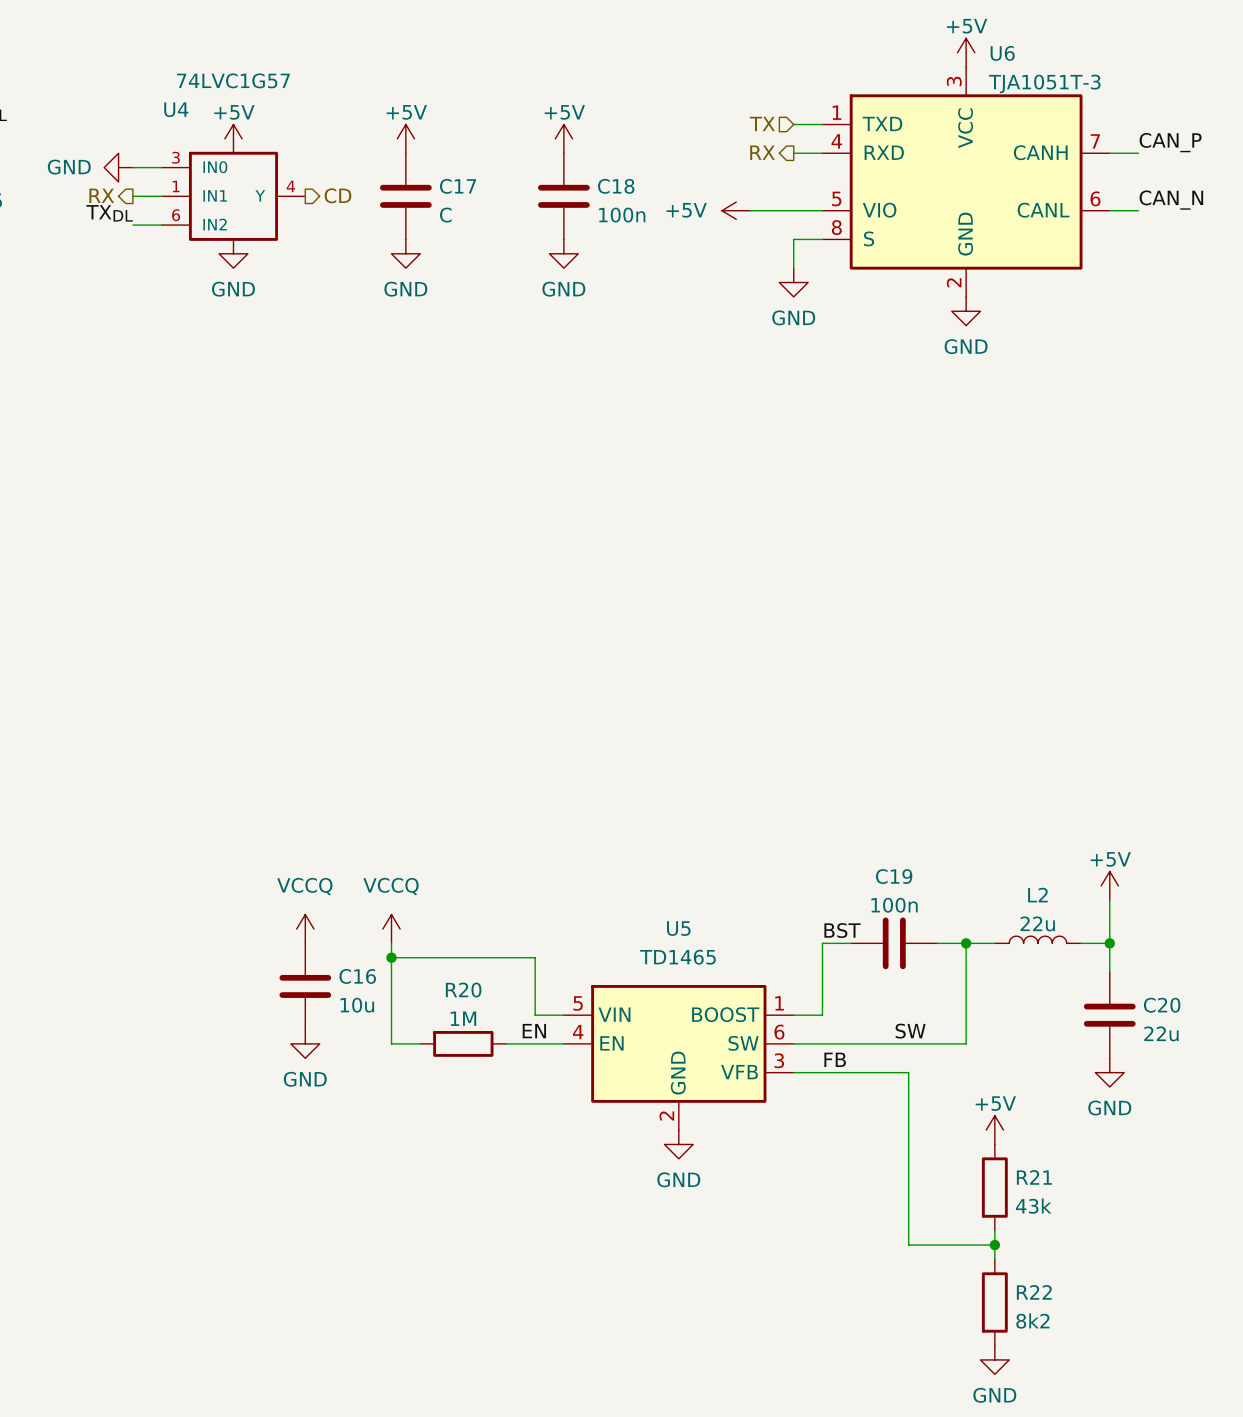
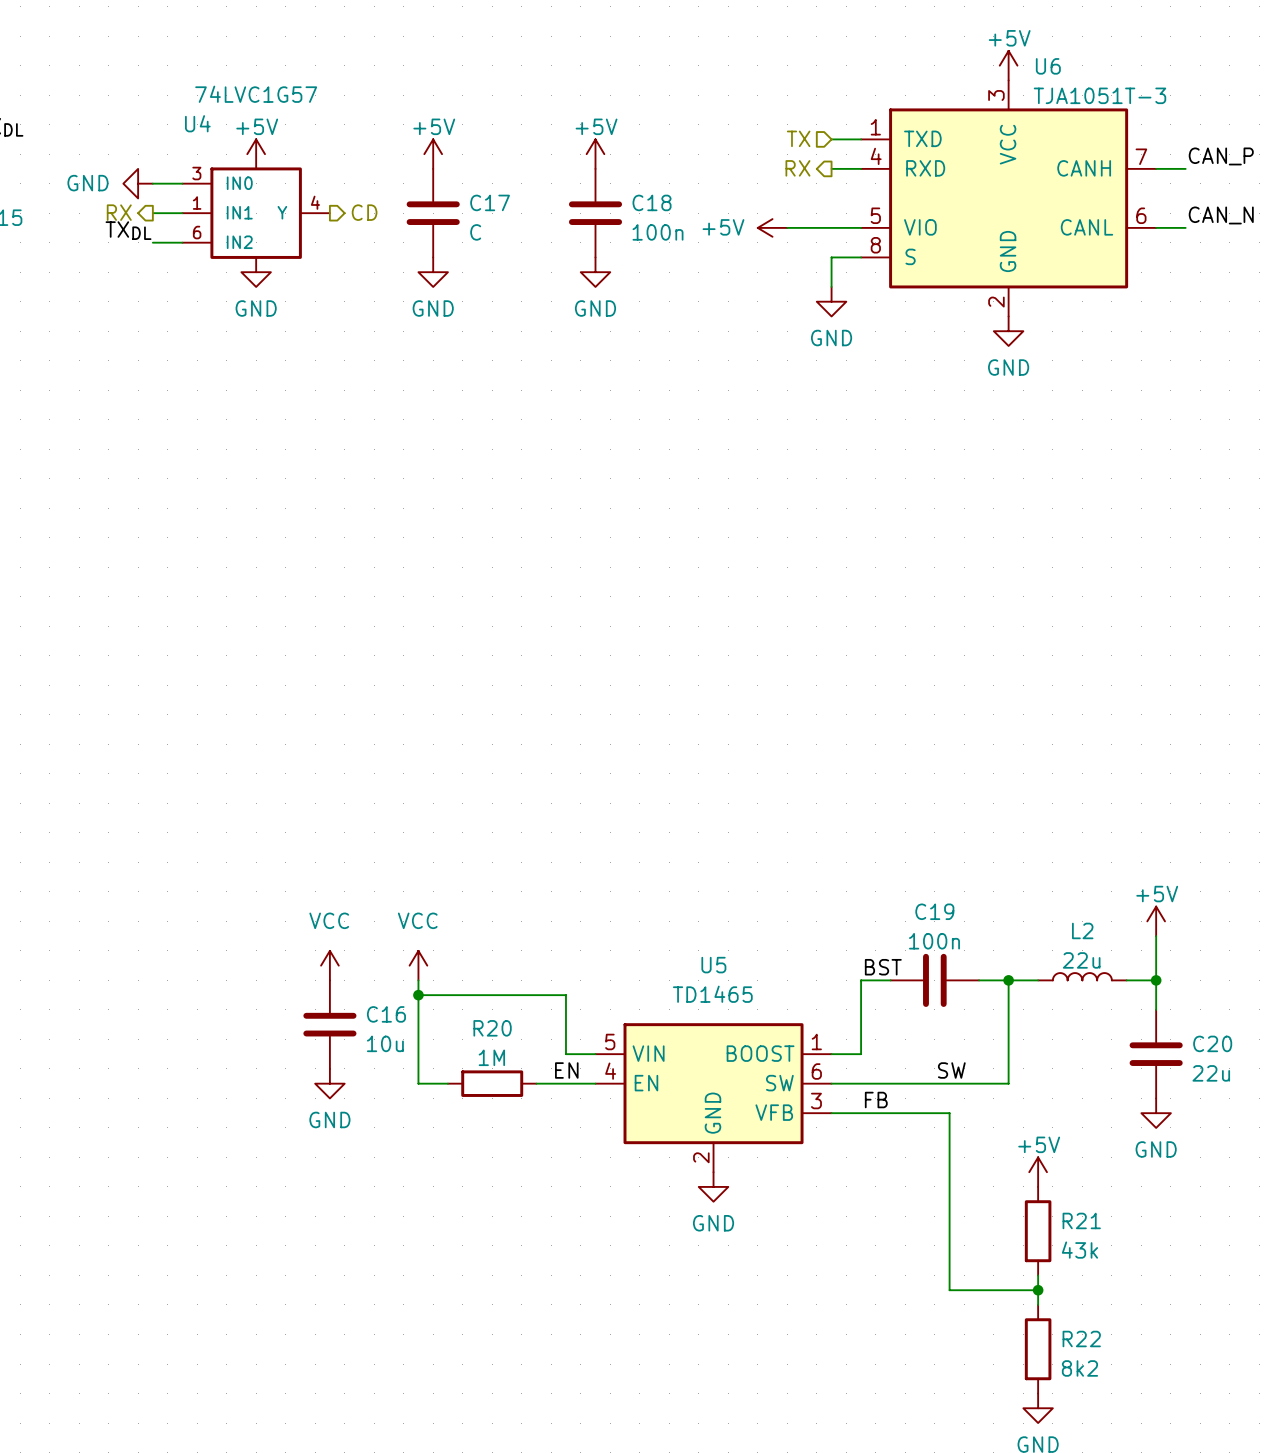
power symbol: VCCQ (305, 928) -> VCC (329, 965)
power symbol: VCCQ (391, 928) -> VCC (418, 965)

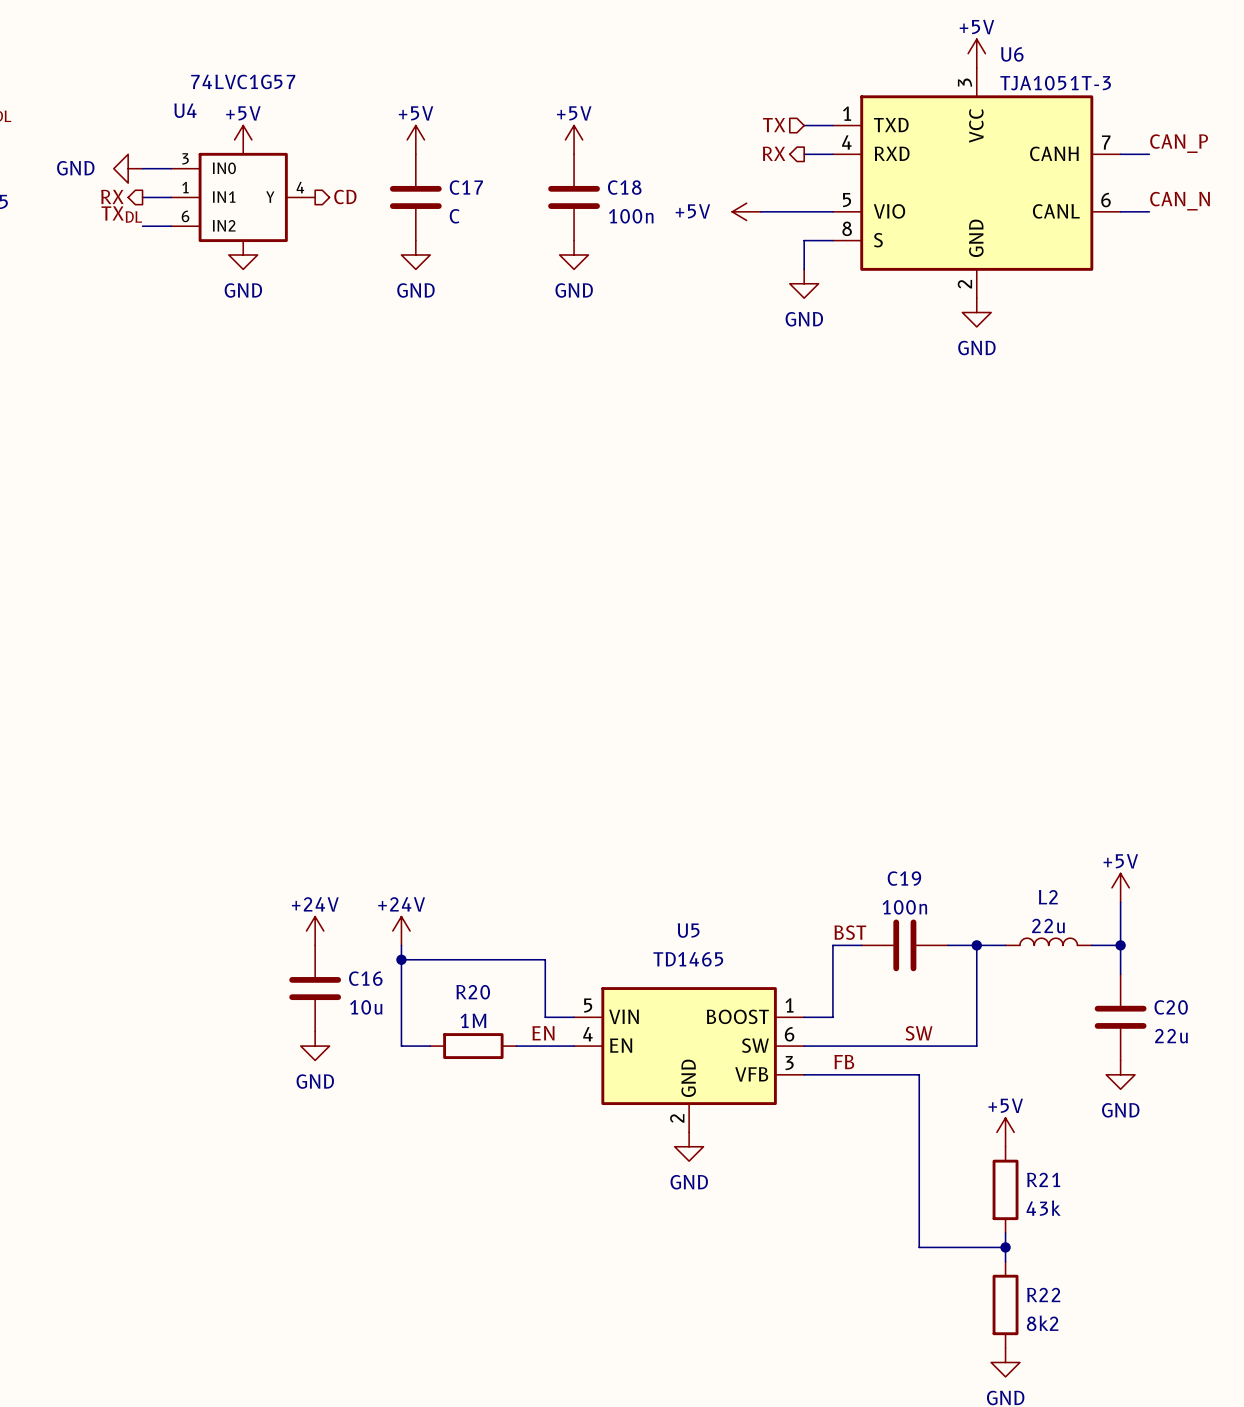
power symbol: VCC (329, 965) -> +24V (315, 931)
power symbol: VCC (418, 965) -> +24V (401, 931)

